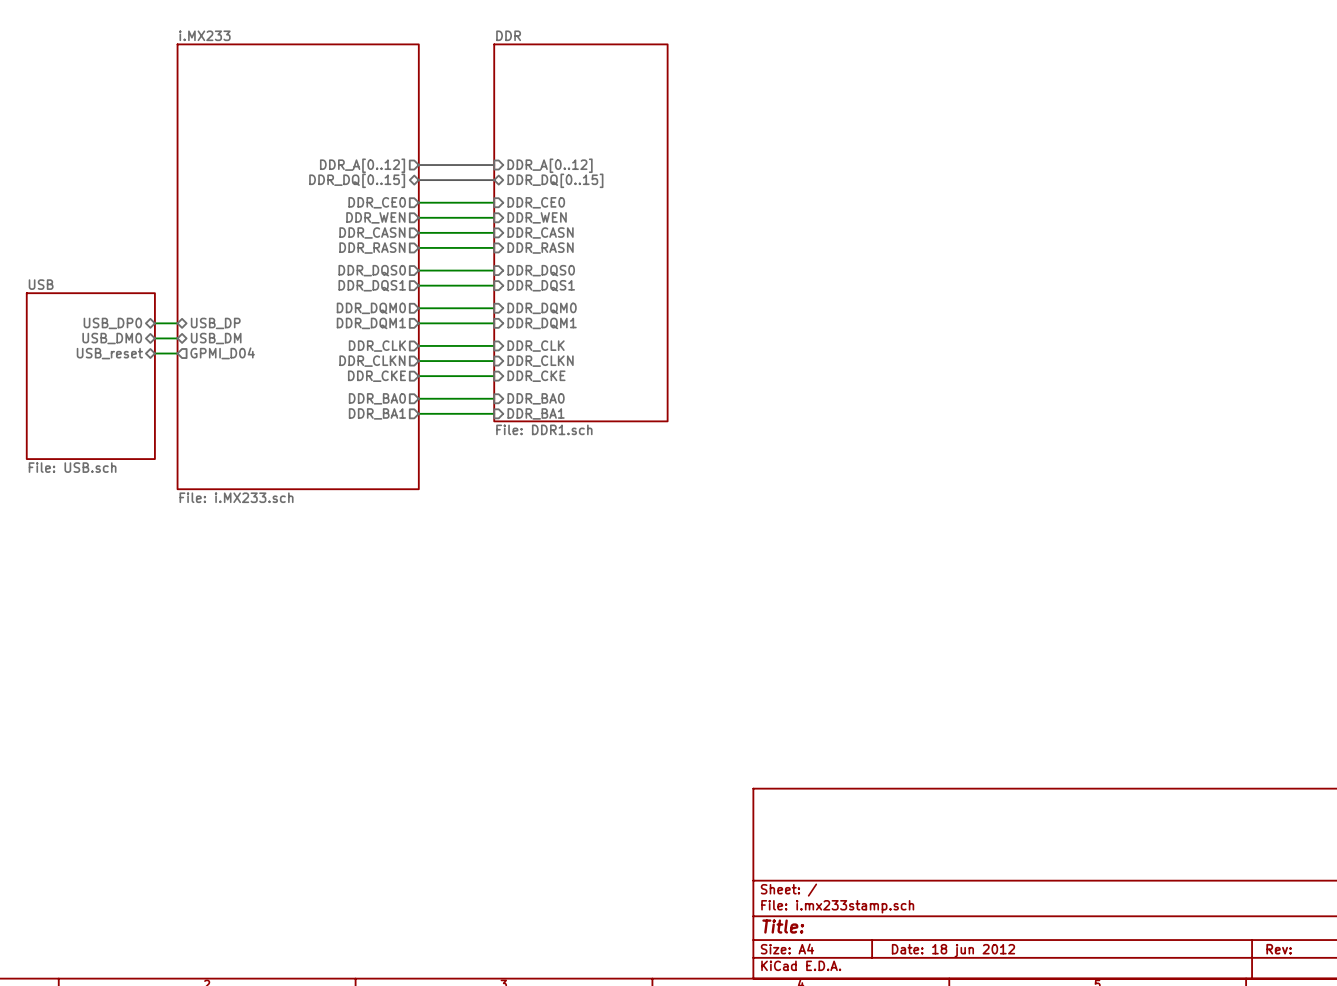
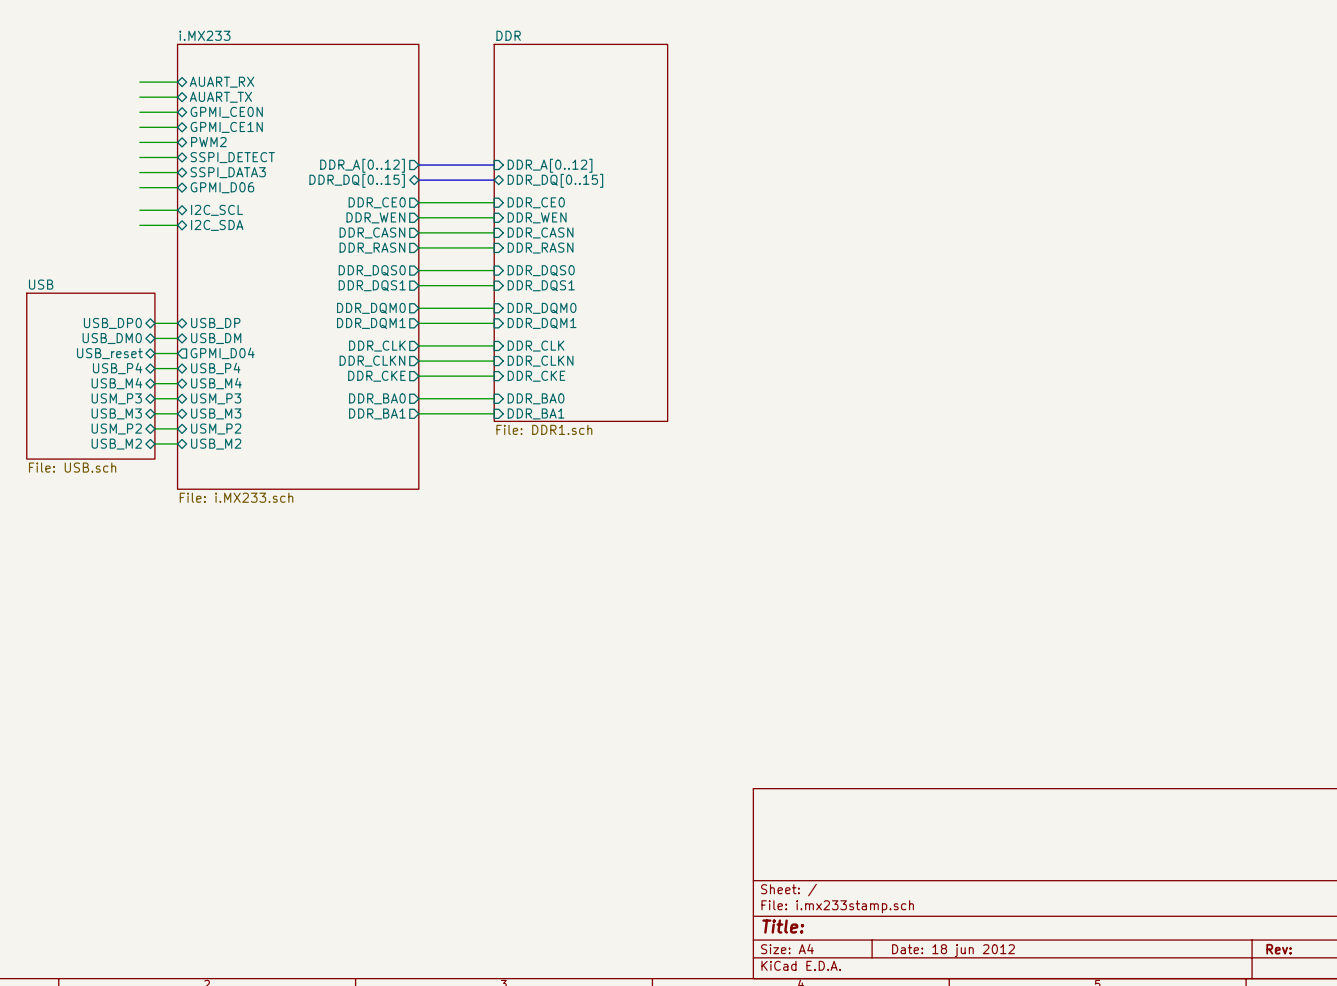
wire: none -> (139, 82) (177, 82)
sheet pin: none -> AUART_RX (221, 82)
wire: none -> (139, 97) (177, 97)
sheet pin: none -> AUART_TX (220, 97)
wire: none -> (139, 112) (177, 112)
sheet pin: none -> GPMI_CE0N (226, 112)
wire: none -> (139, 127) (177, 127)
sheet pin: none -> GPMI_CE1N (226, 127)
wire: none -> (139, 142) (177, 142)
sheet pin: none -> PWM2 (208, 142)
wire: none -> (139, 157) (177, 157)
sheet pin: none -> SSPI_DETECT (232, 157)
wire: none -> (139, 172) (177, 172)
sheet pin: none -> SSPI_DATA3 (228, 172)
wire: none -> (139, 187) (177, 187)
sheet pin: none -> GPMI_D06 (222, 187)
wire: none -> (139, 210) (177, 210)
sheet pin: none -> I2C_SCL (217, 210)
wire: none -> (139, 225) (177, 225)
sheet pin: none -> I2C_SDA (217, 225)
sheet pin: none -> USB_P4 (117, 368)
wire: none -> (154, 368) (177, 368)
sheet pin: none -> USB_P4 (215, 368)
sheet pin: none -> USB_M4 (116, 383)
wire: none -> (154, 383) (177, 383)
sheet pin: none -> USB_M4 (216, 383)
sheet pin: none -> USM_P3 (116, 398)
wire: none -> (154, 398) (177, 398)
sheet pin: none -> USM_P3 (216, 398)
sheet pin: none -> USB_M3 (116, 413)
wire: none -> (154, 413) (177, 413)
sheet pin: none -> USB_M3 (216, 413)
wire: none -> (154, 428) (177, 428)
sheet pin: none -> USM_P2 (116, 429)
sheet pin: none -> USM_P2 (216, 429)
wire: none -> (154, 443) (177, 443)
sheet pin: none -> USB_M2 (116, 444)
sheet pin: none -> USB_M2 (216, 444)

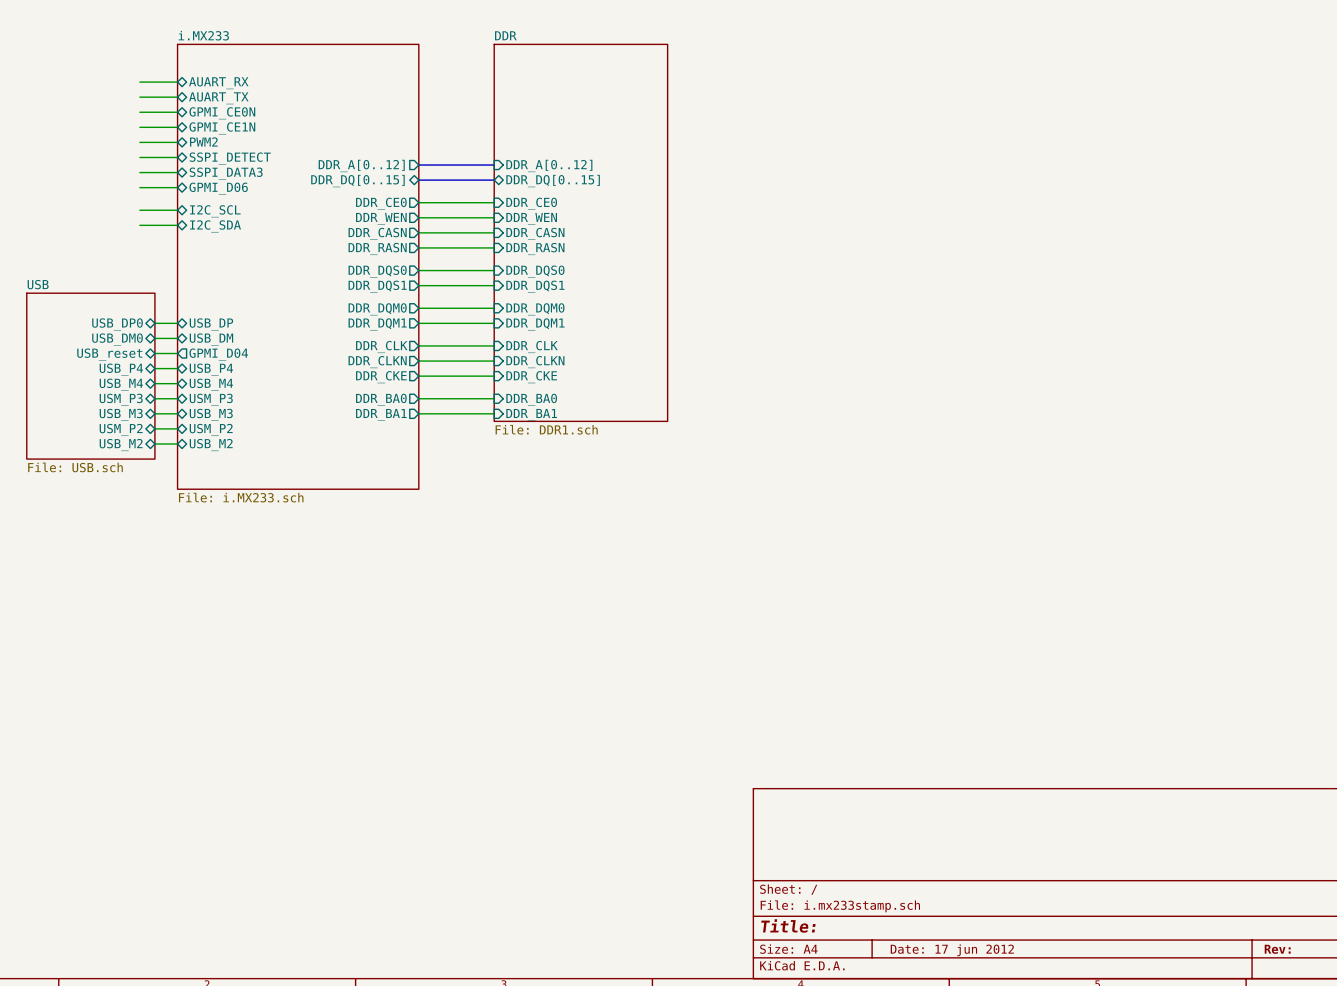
title block: Date: 18 jun 2012 (953, 950) -> Date: 17 jun 2012 (952, 950)

